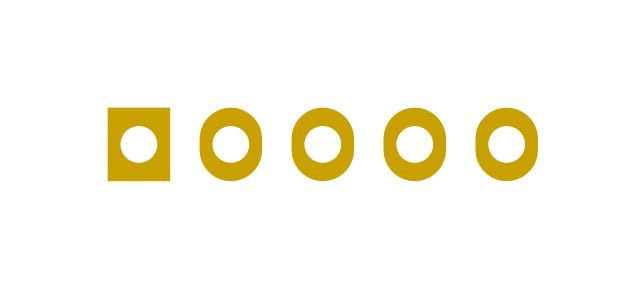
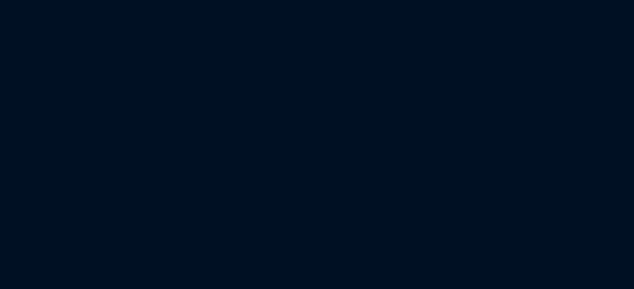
part: (322, 144) -> none

